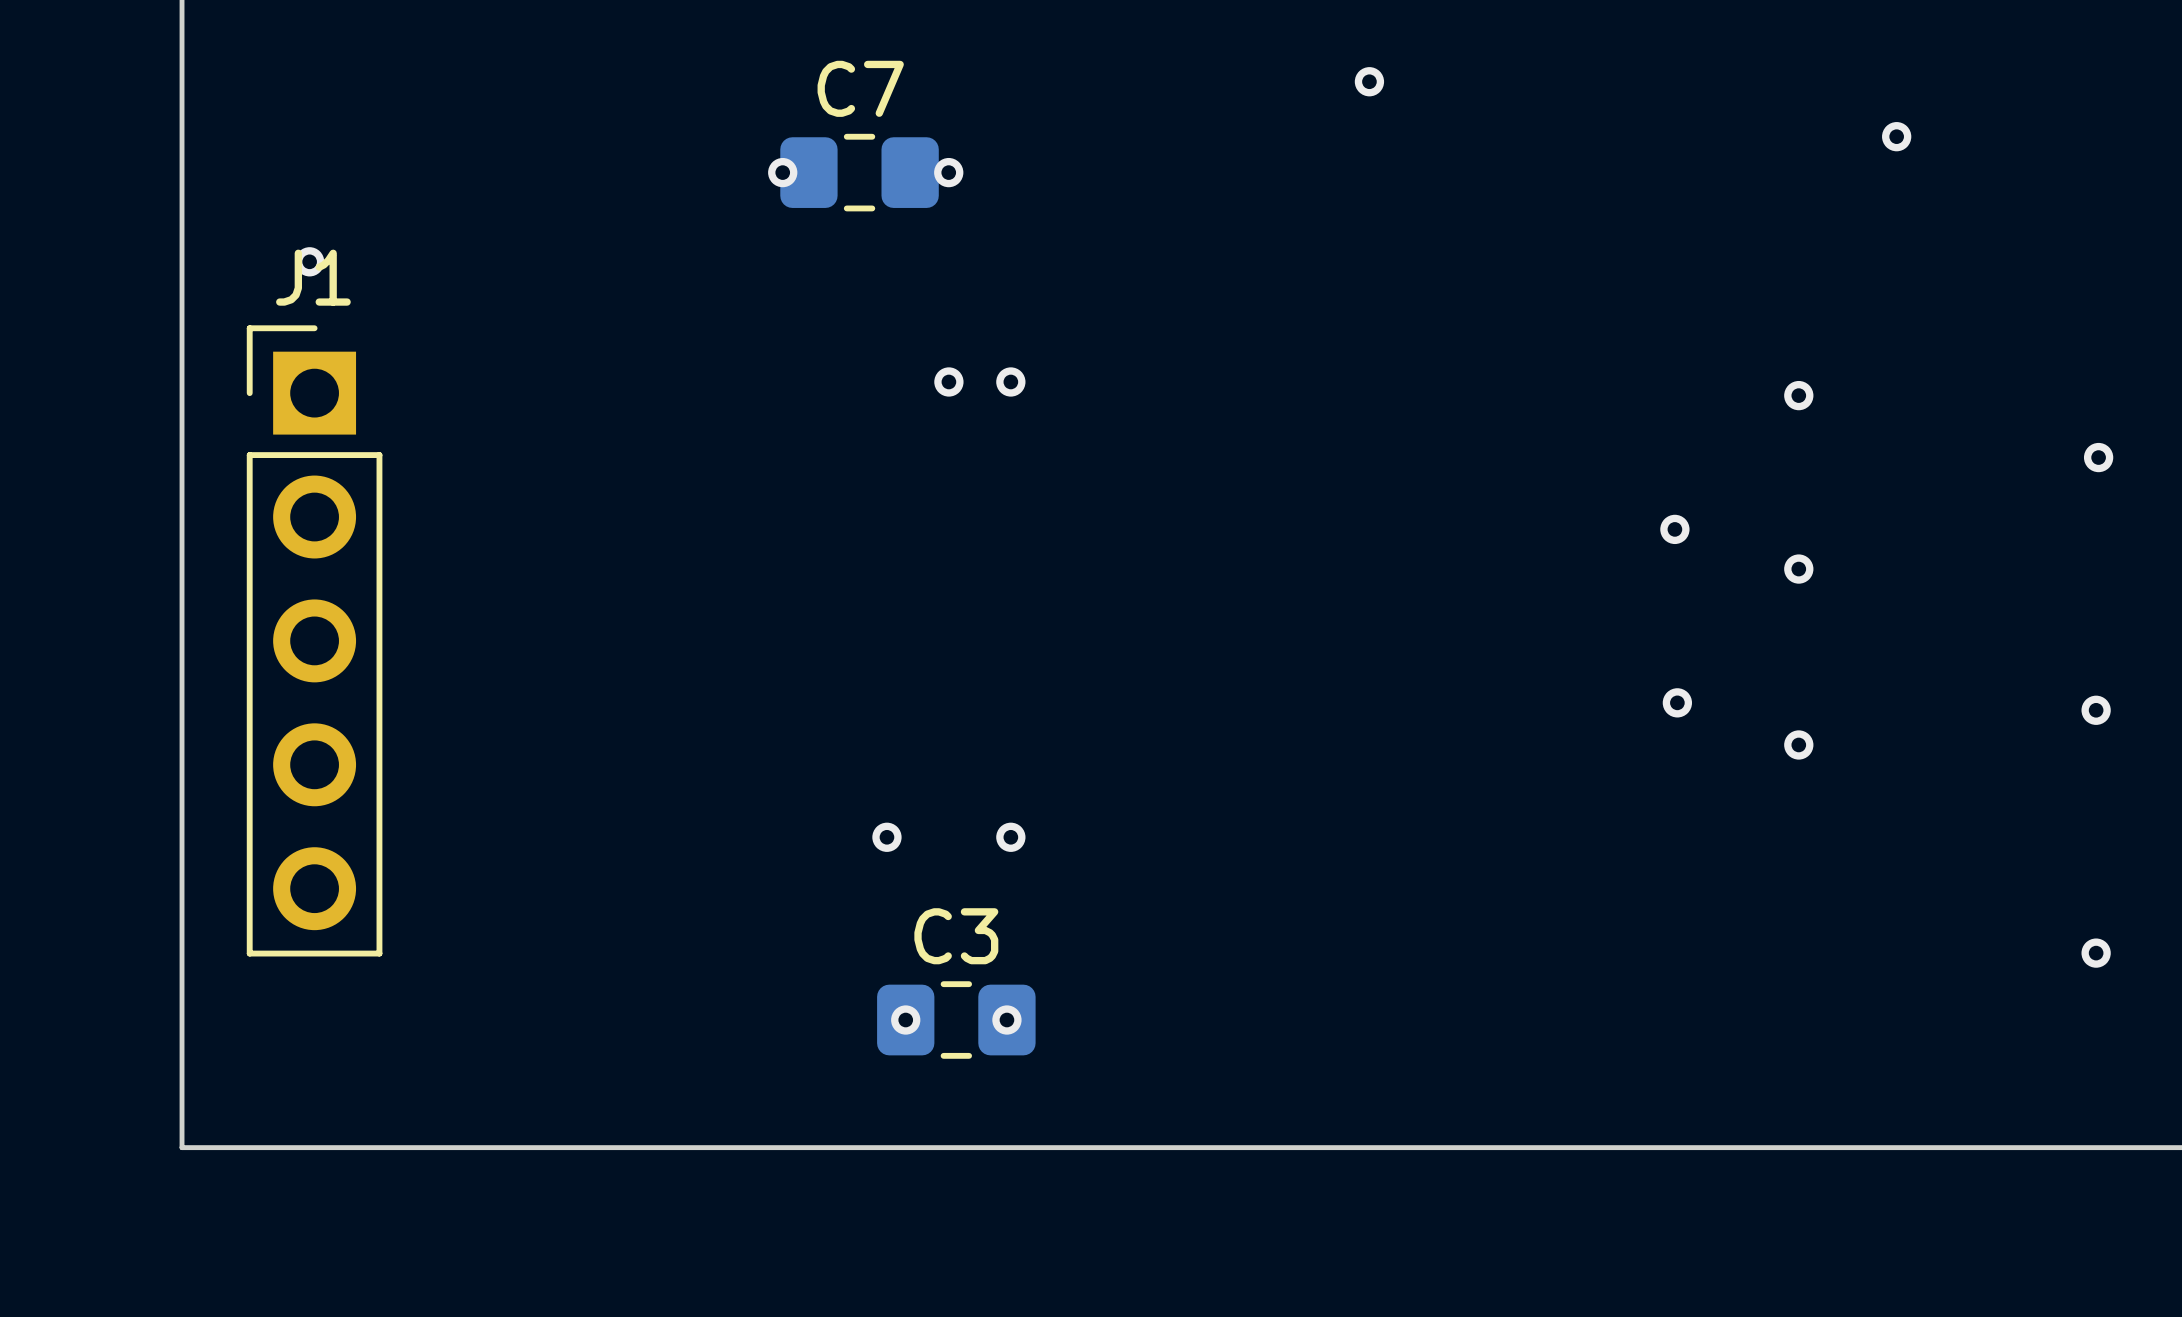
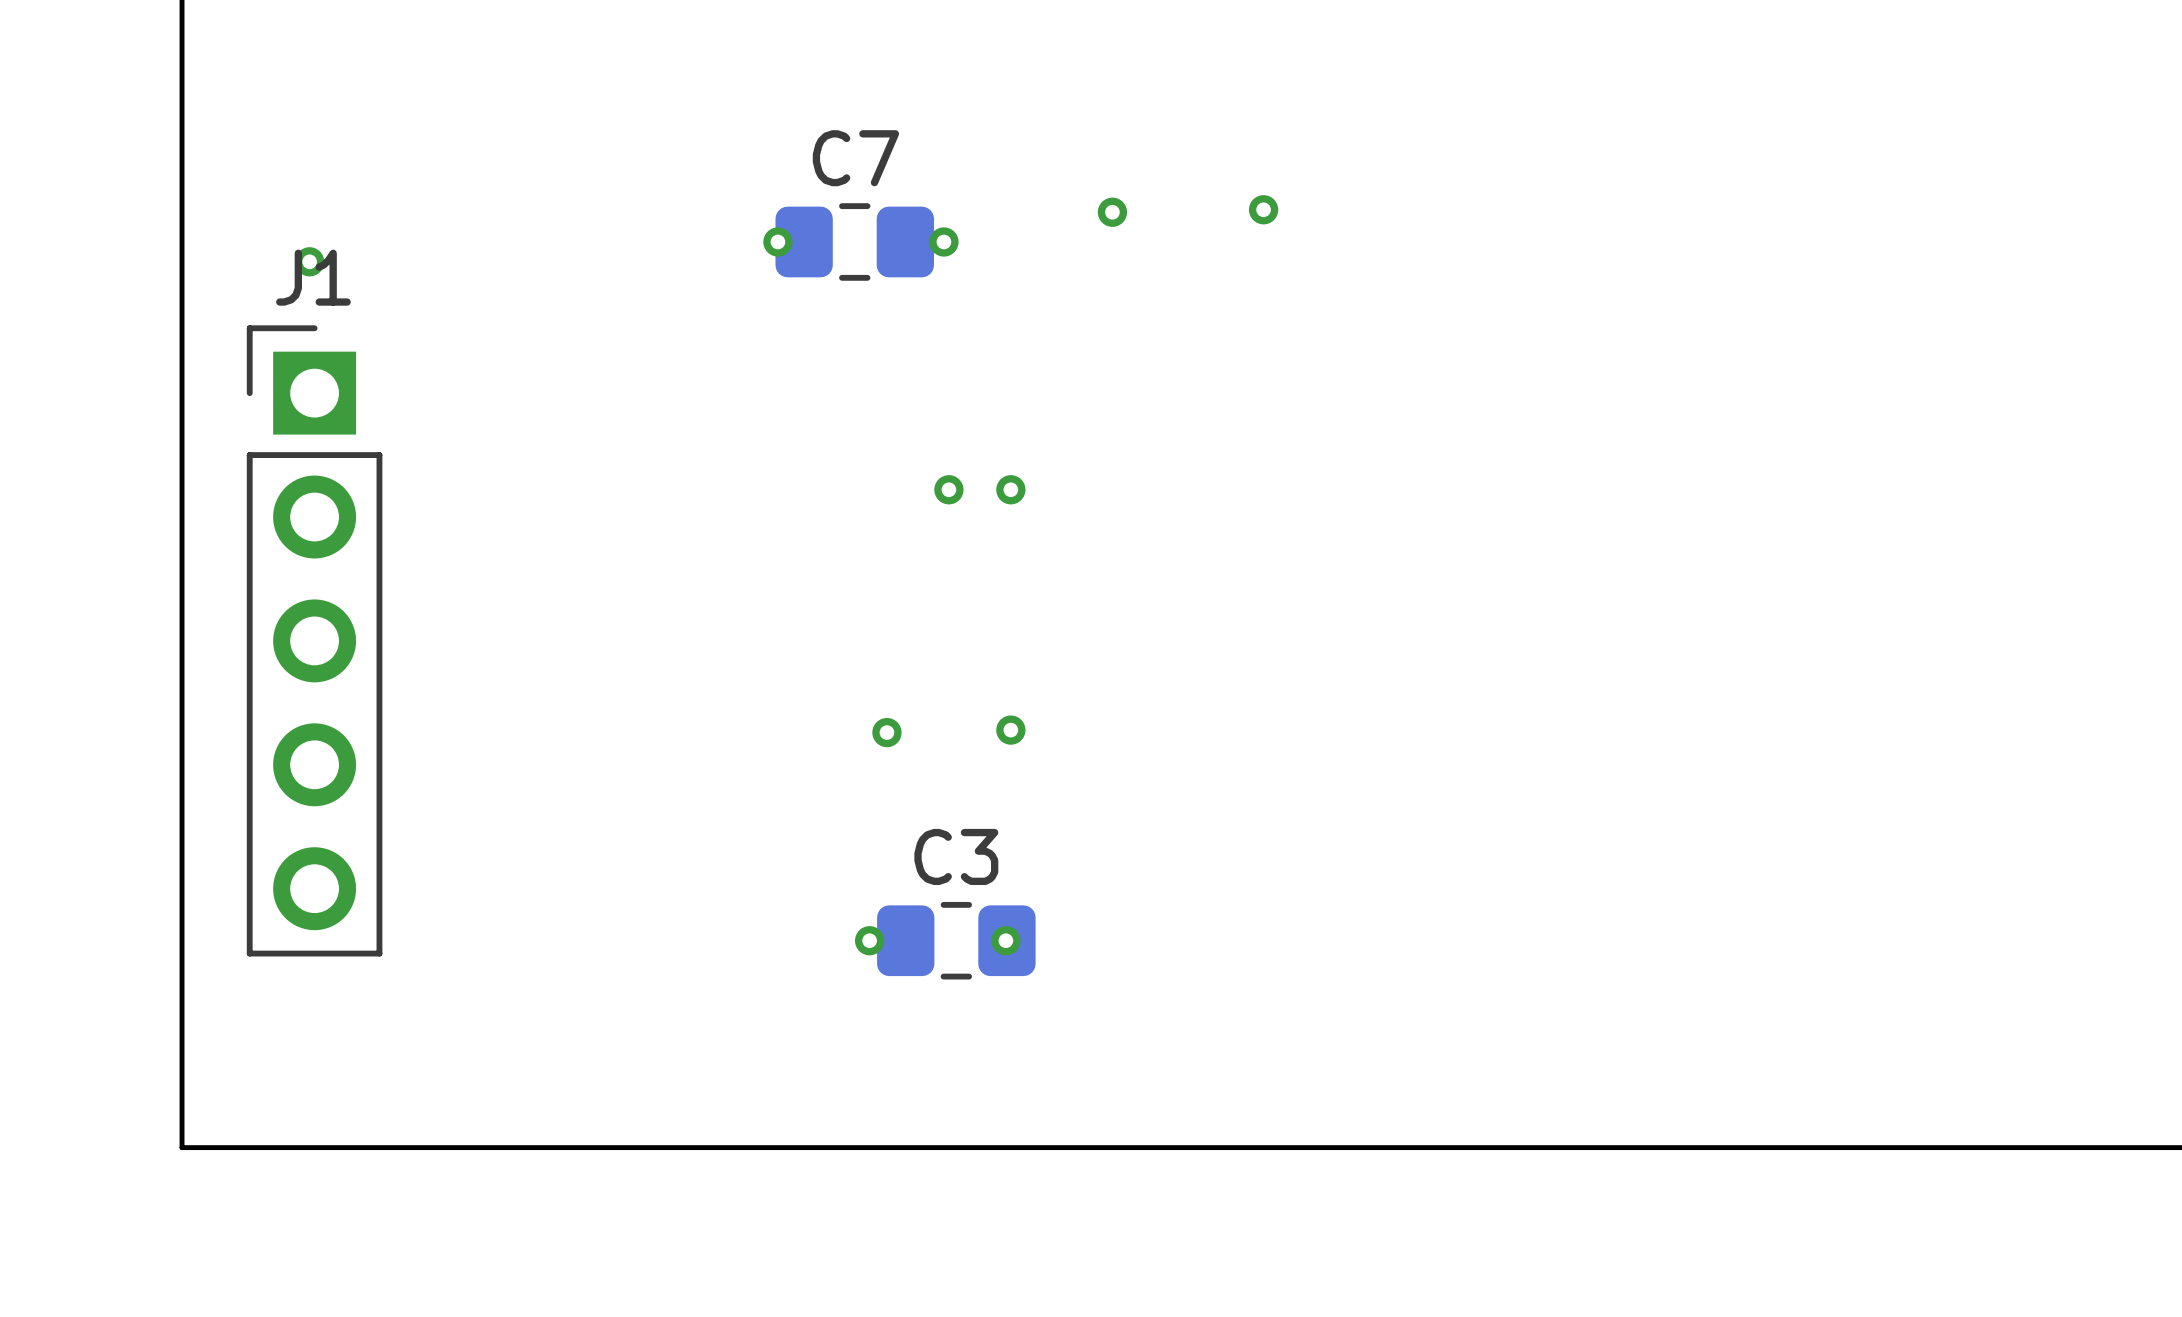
via: (1369, 81) -> none
via: (1896, 136) -> none
via position: (782, 172) -> (777, 241)
C7 position: (859, 172) -> (854, 241)
via position: (948, 172) -> (943, 241)
via: none -> (1263, 209)
via: none -> (1112, 212)
via: (948, 381) -> none
via: (1010, 381) -> none
via: (1798, 395) -> none
via: (2098, 457) -> none
via: none -> (948, 489)
via: none -> (1010, 489)
via: (1674, 529) -> none
via: (1798, 569) -> none
via: (1677, 702) -> none
via: (2096, 710) -> none
via: none -> (1010, 730)
via: none -> (886, 732)
via: (1798, 744) -> none
via: (886, 837) -> none
via: (1010, 837) -> none
via: none -> (869, 940)
via: none -> (1005, 940)
via: (2096, 953) -> none
via: (905, 1020) -> none
C3 position: (956, 1020) -> (956, 940)
via: (1006, 1020) -> none

